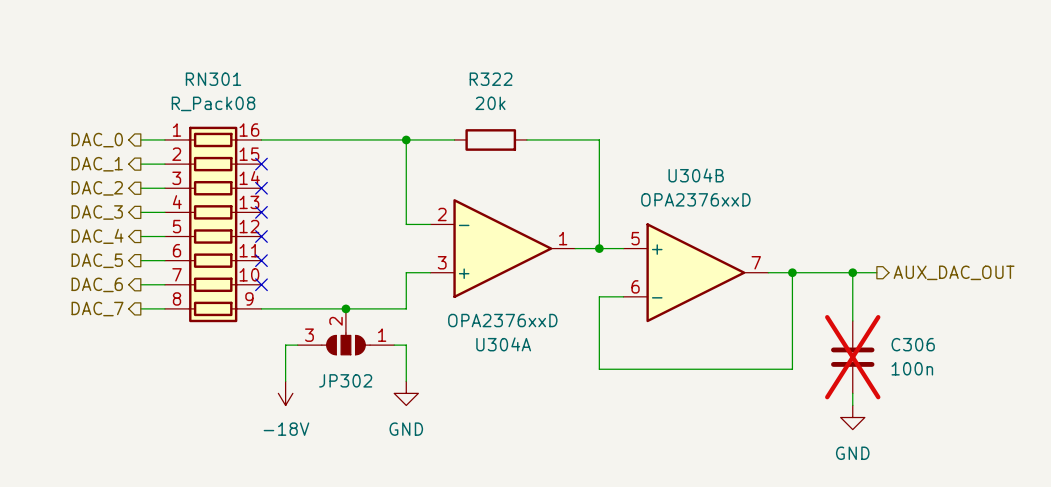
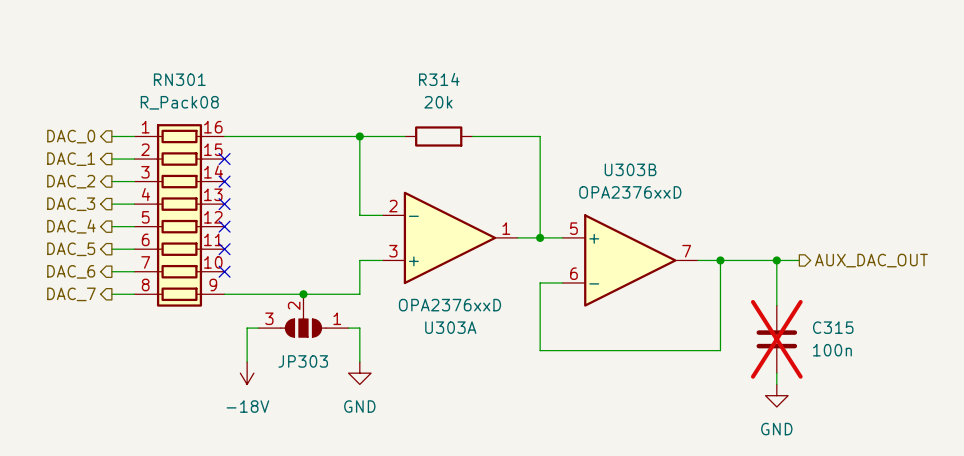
R322 name: R322 (491, 79) -> R314 (439, 79)
U304B name: U304B (696, 175) -> U303B (630, 169)
U304A name: U304A (503, 344) -> U303A (450, 327)
C306 name: C306 (913, 344) -> C315 (833, 327)
JP302 name: JP302 (345, 380) -> JP303 (303, 361)

